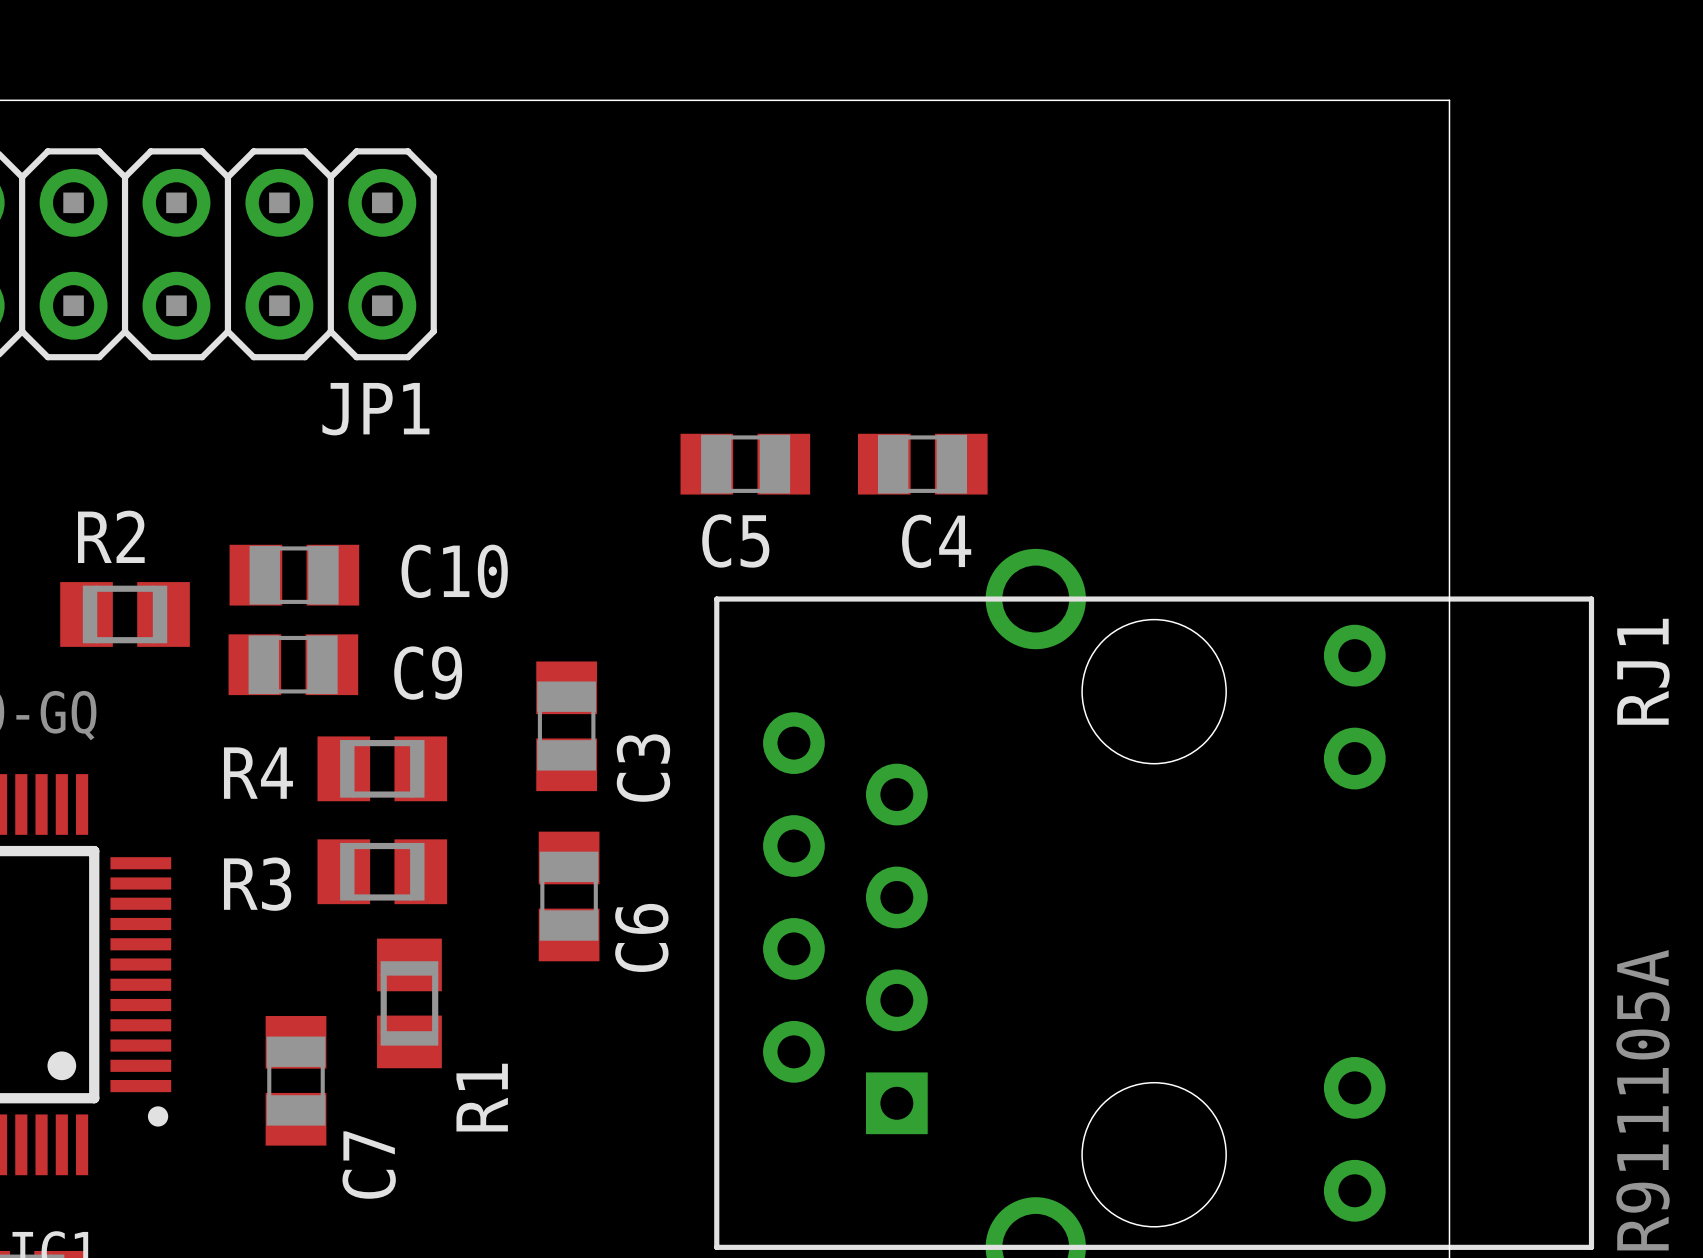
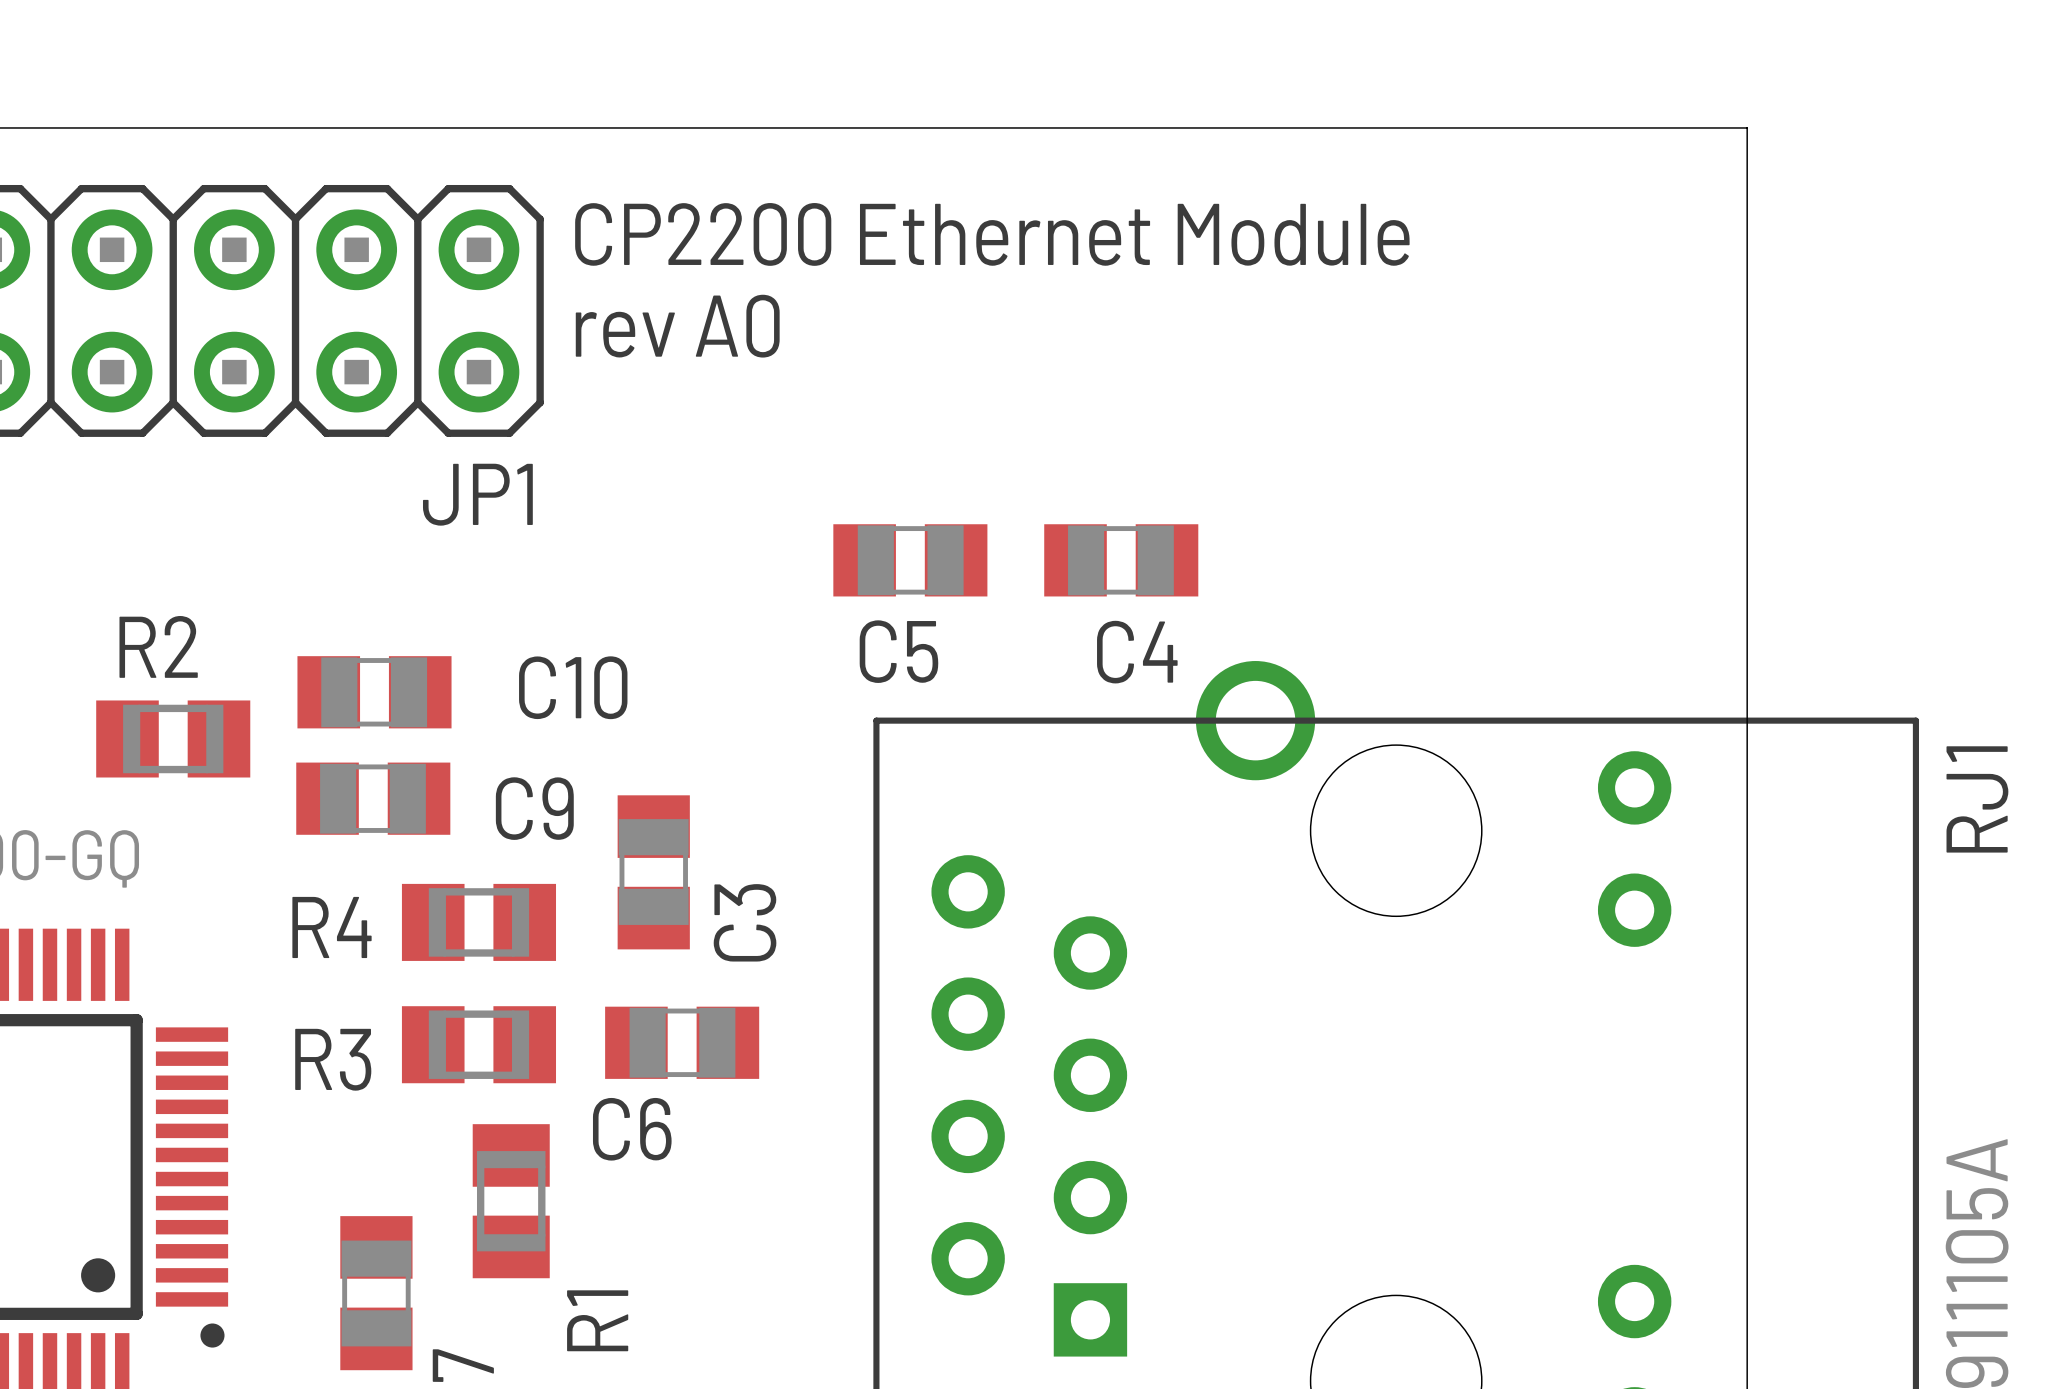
text: none -> CP2200 Ethernet Module (992, 234)
text: none -> rev A0 (677, 326)
C3 position: (566, 726) -> (653, 872)
C6 rotation: 0° (569, 896) -> 90° clockwise (682, 1042)

